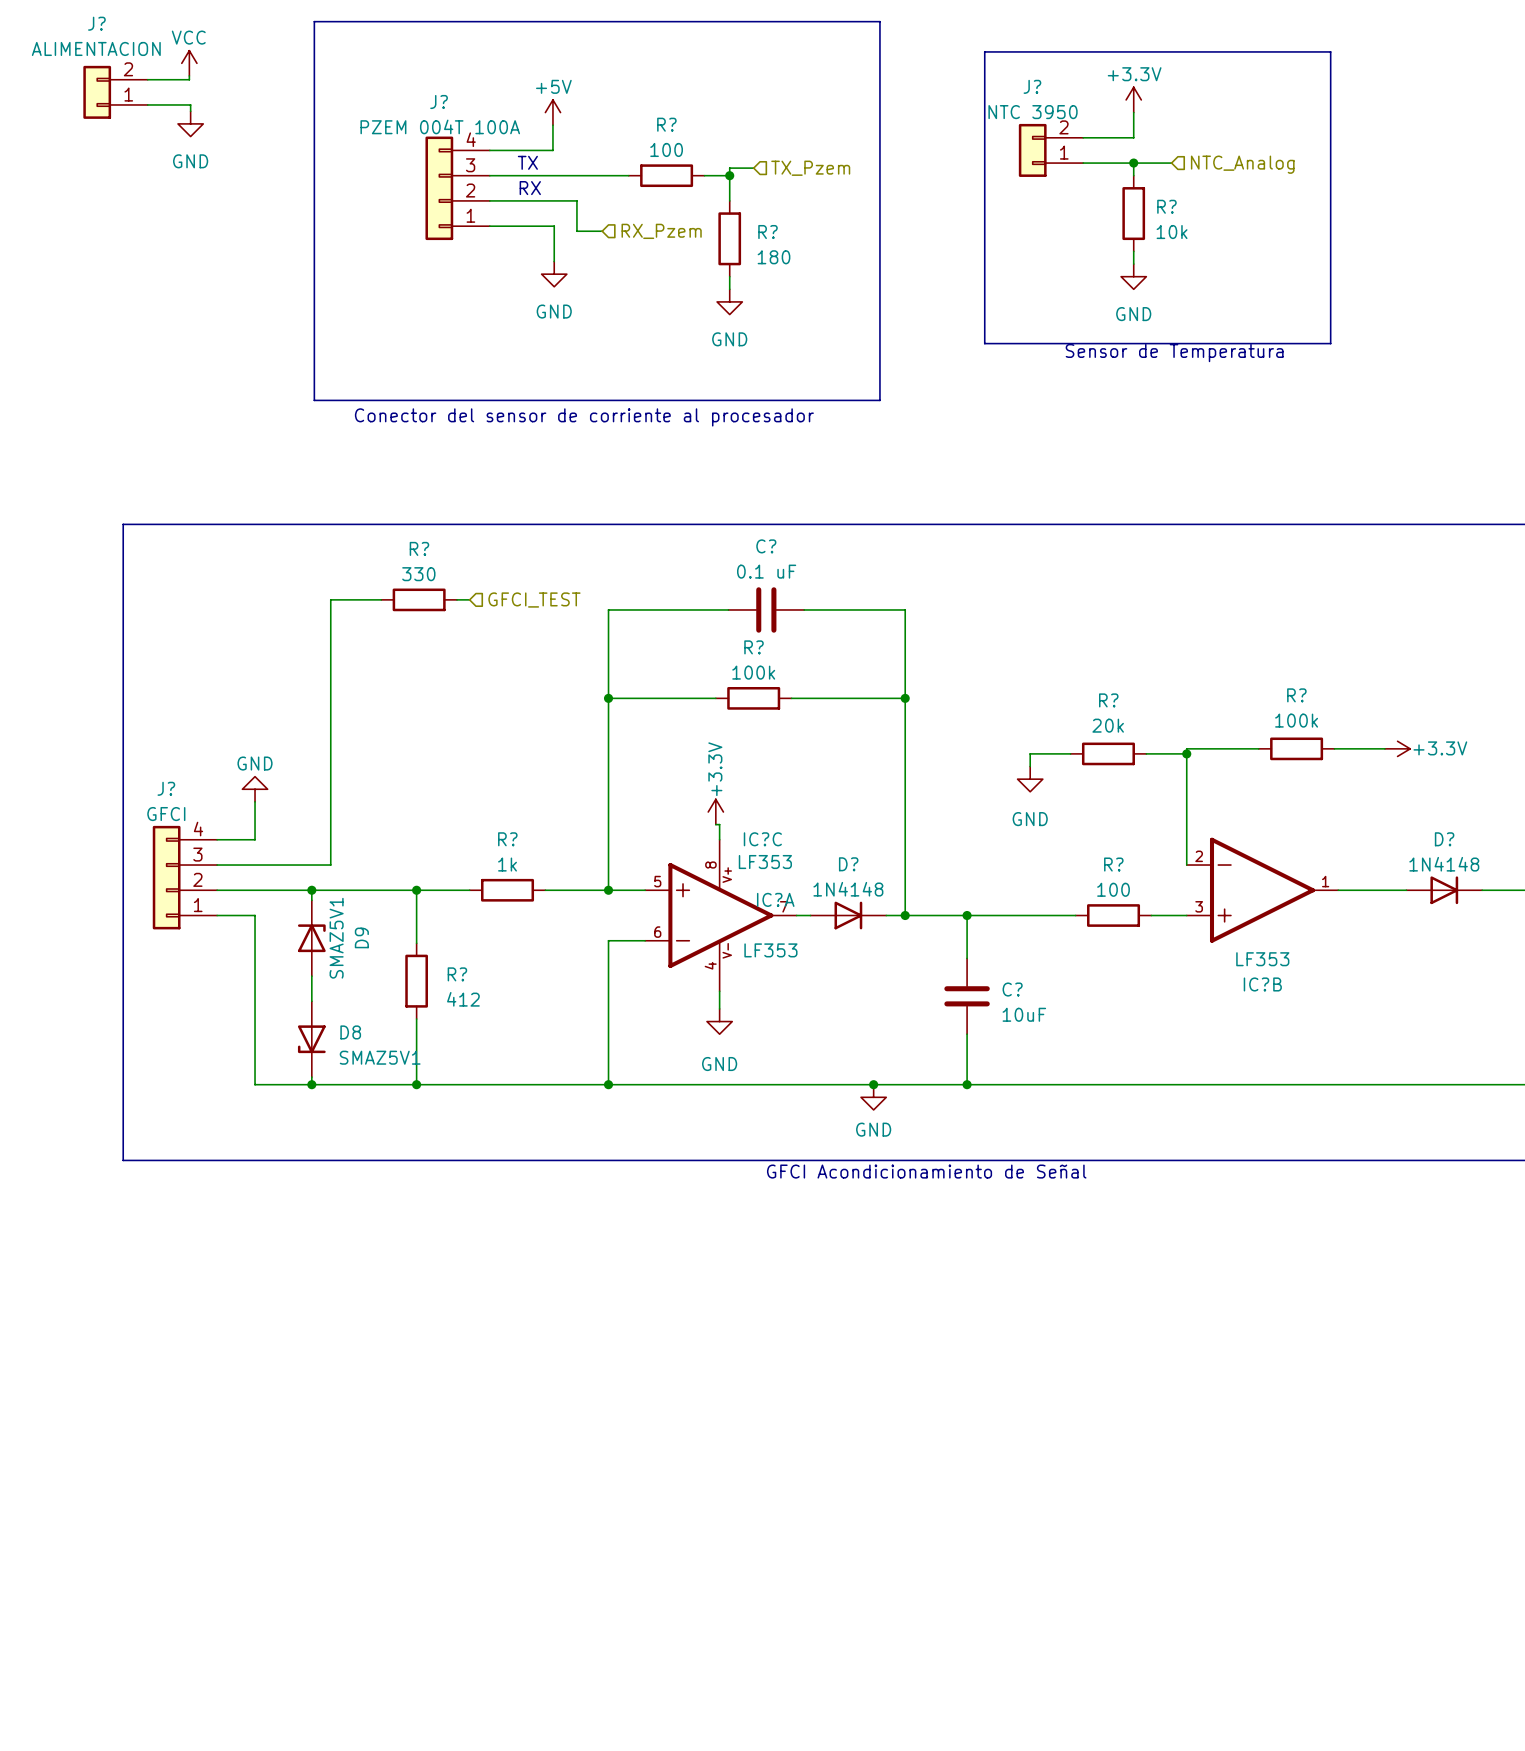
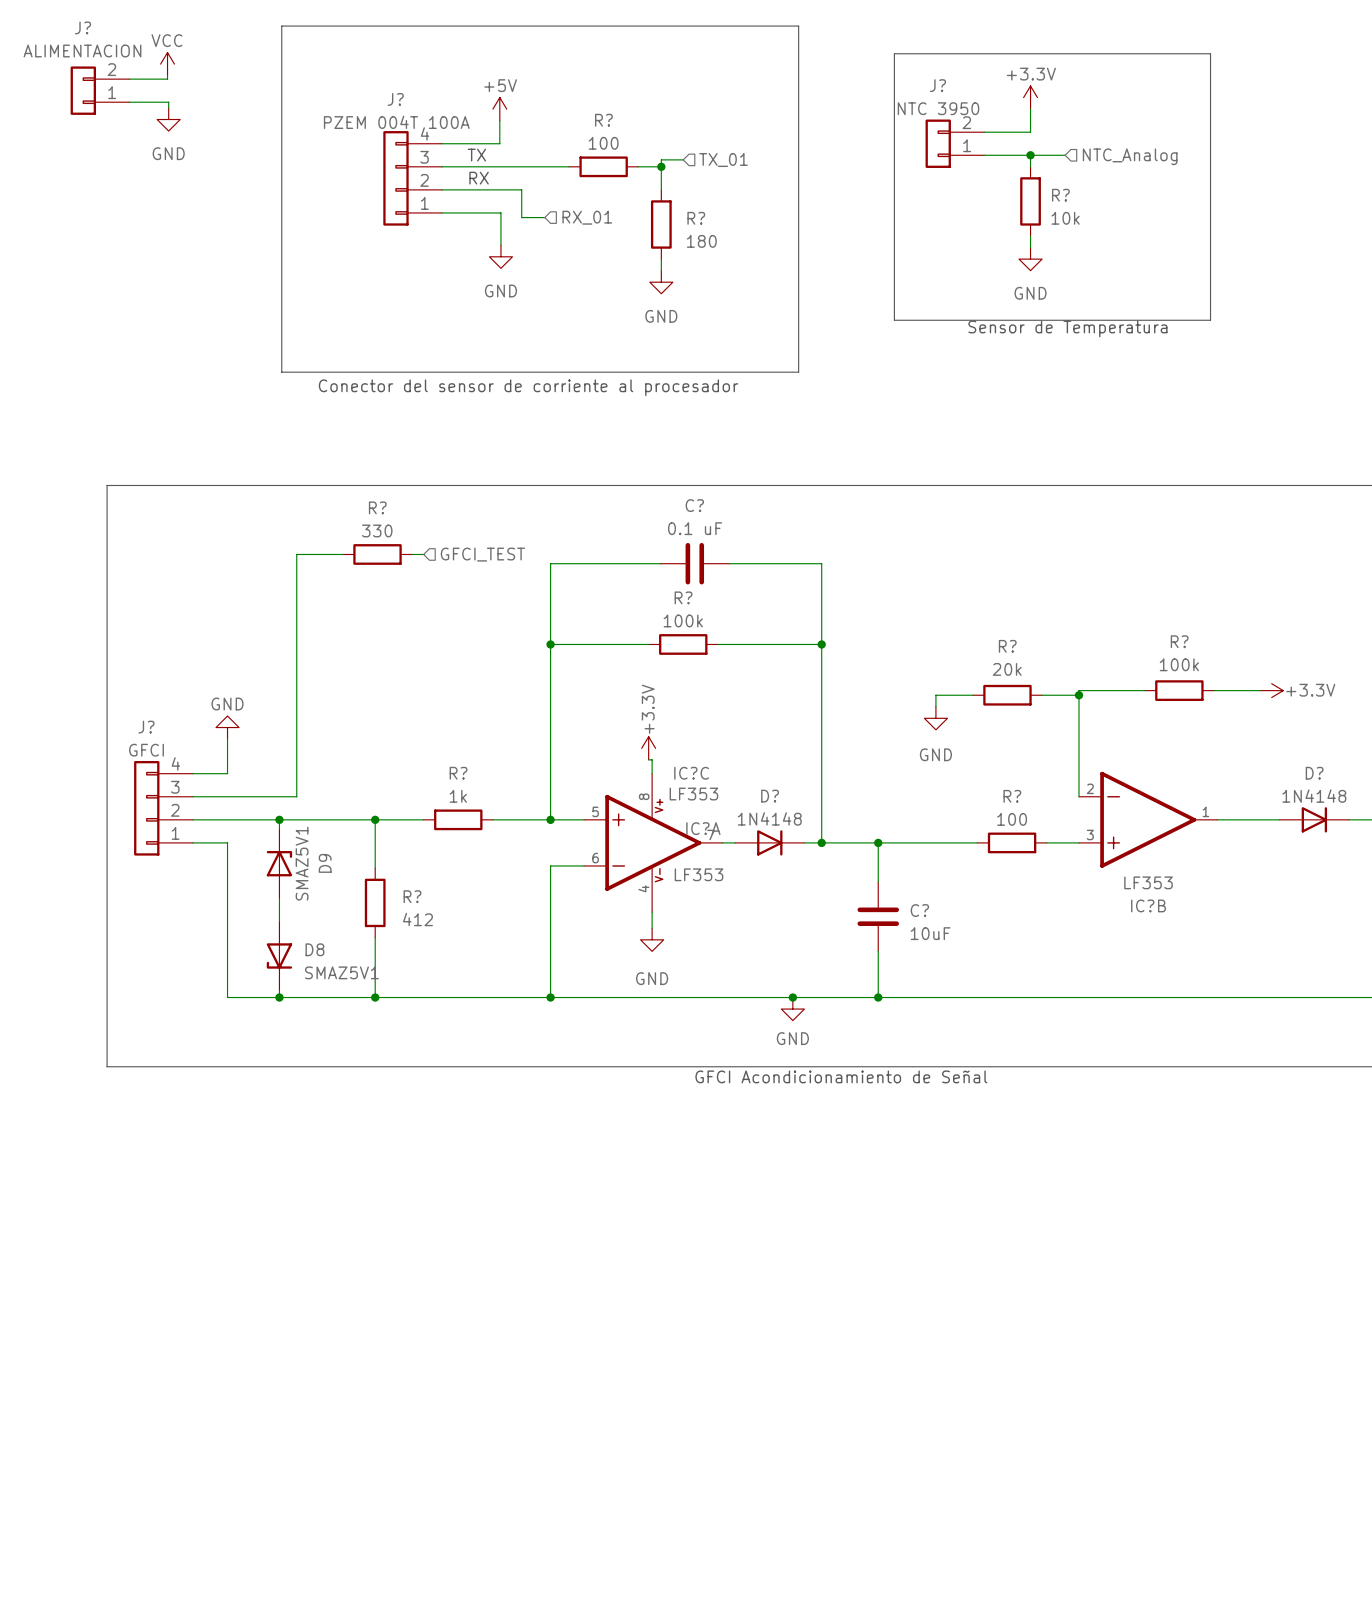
hierarchical label: TX_Pzem (810, 168) -> TX_01 (723, 160)
hierarchical label: RX_Pzem (661, 231) -> RX_01 (587, 217)

